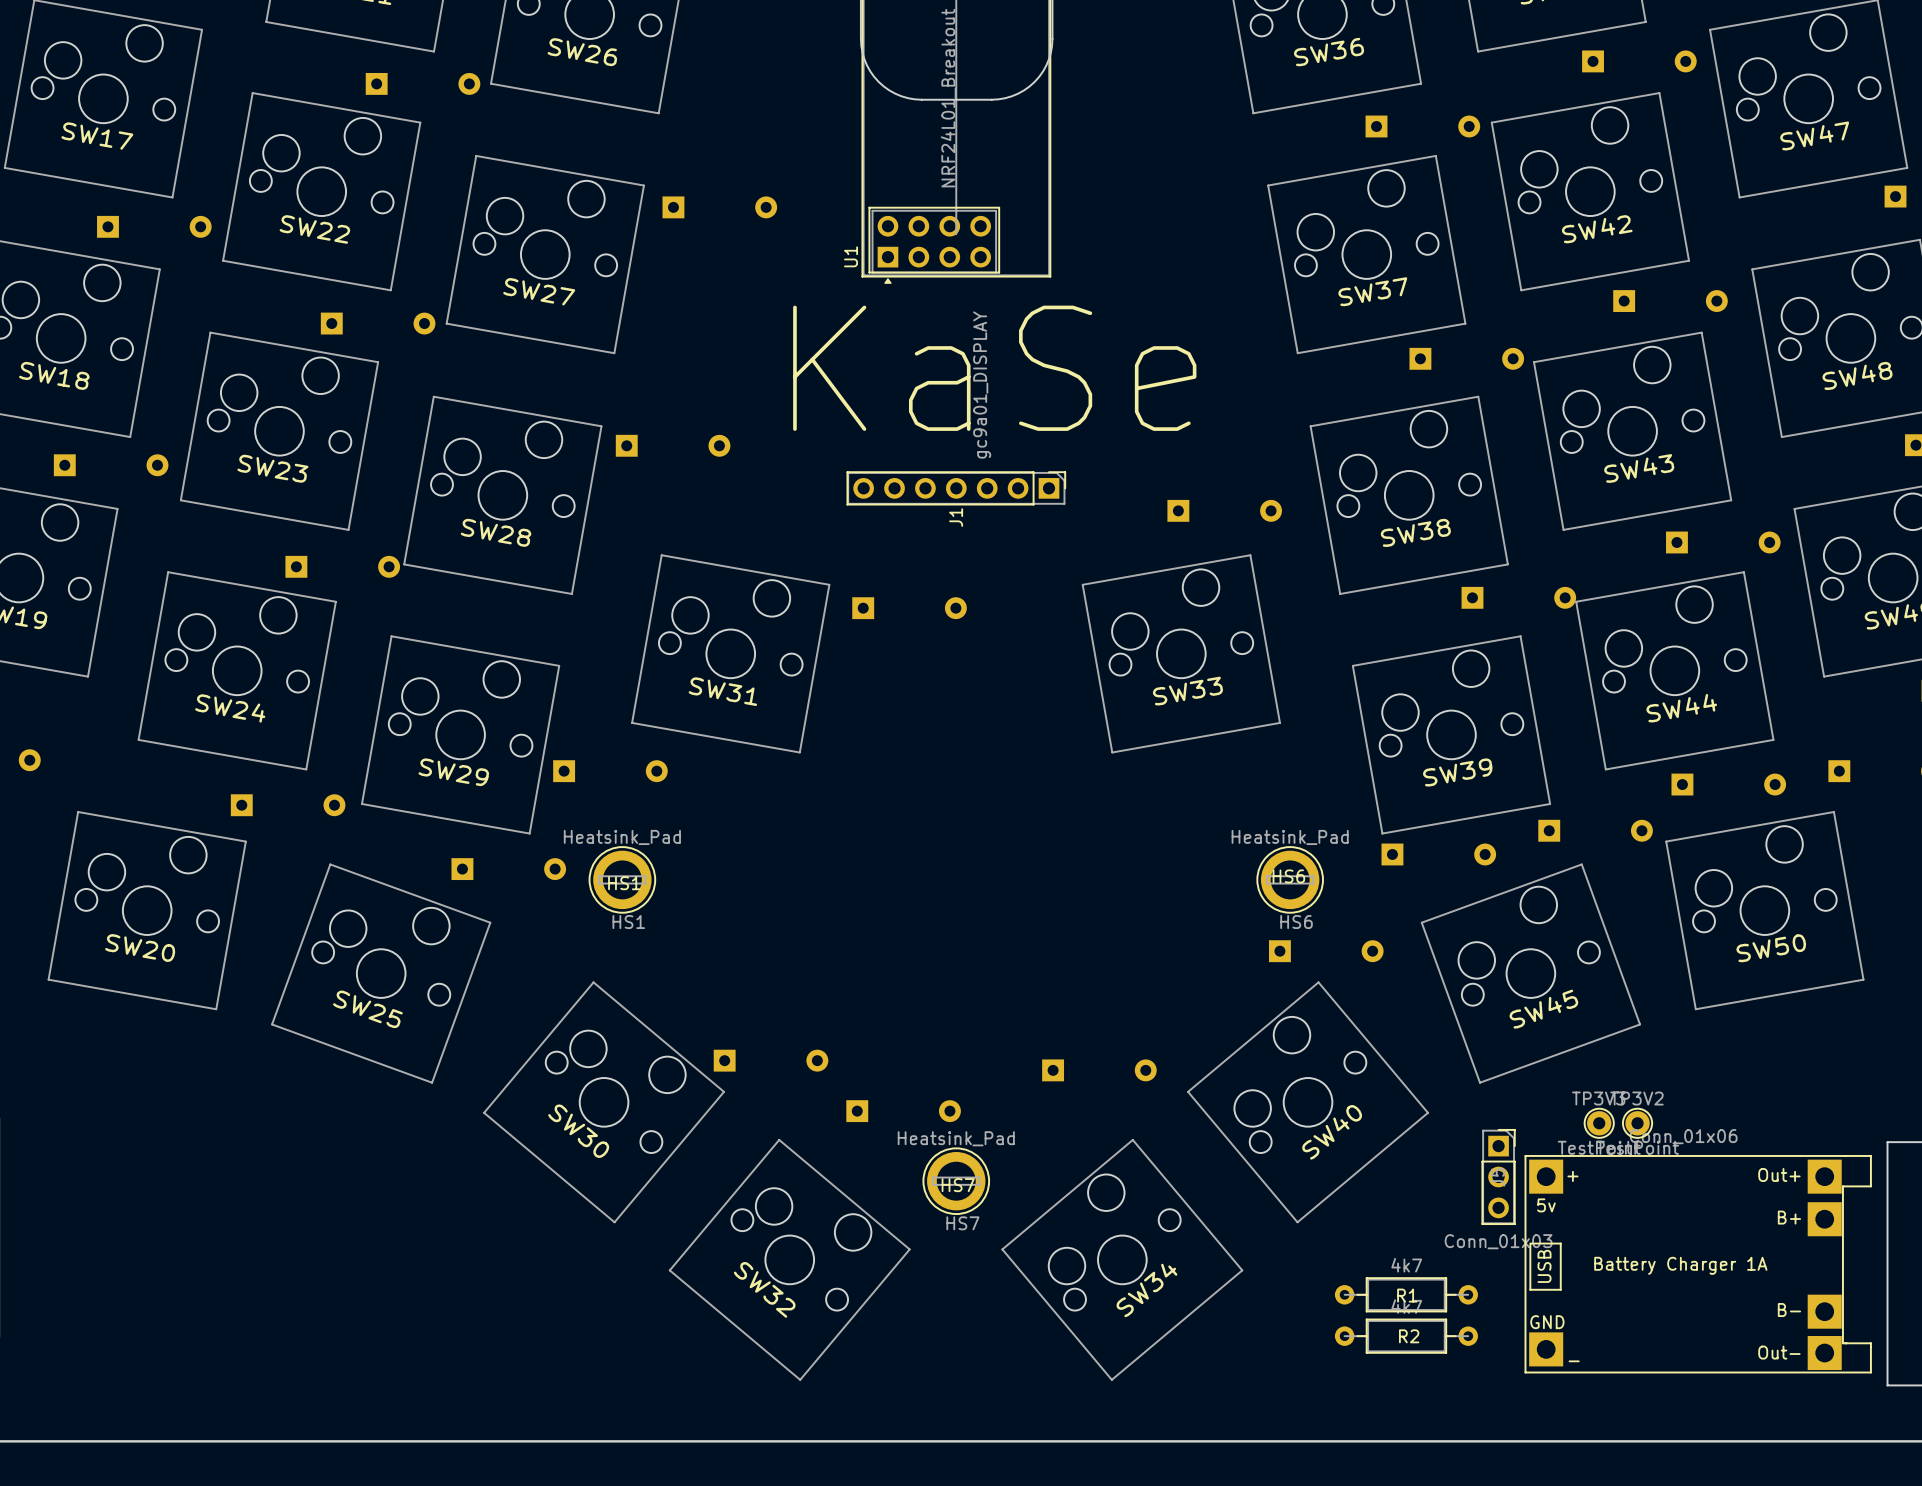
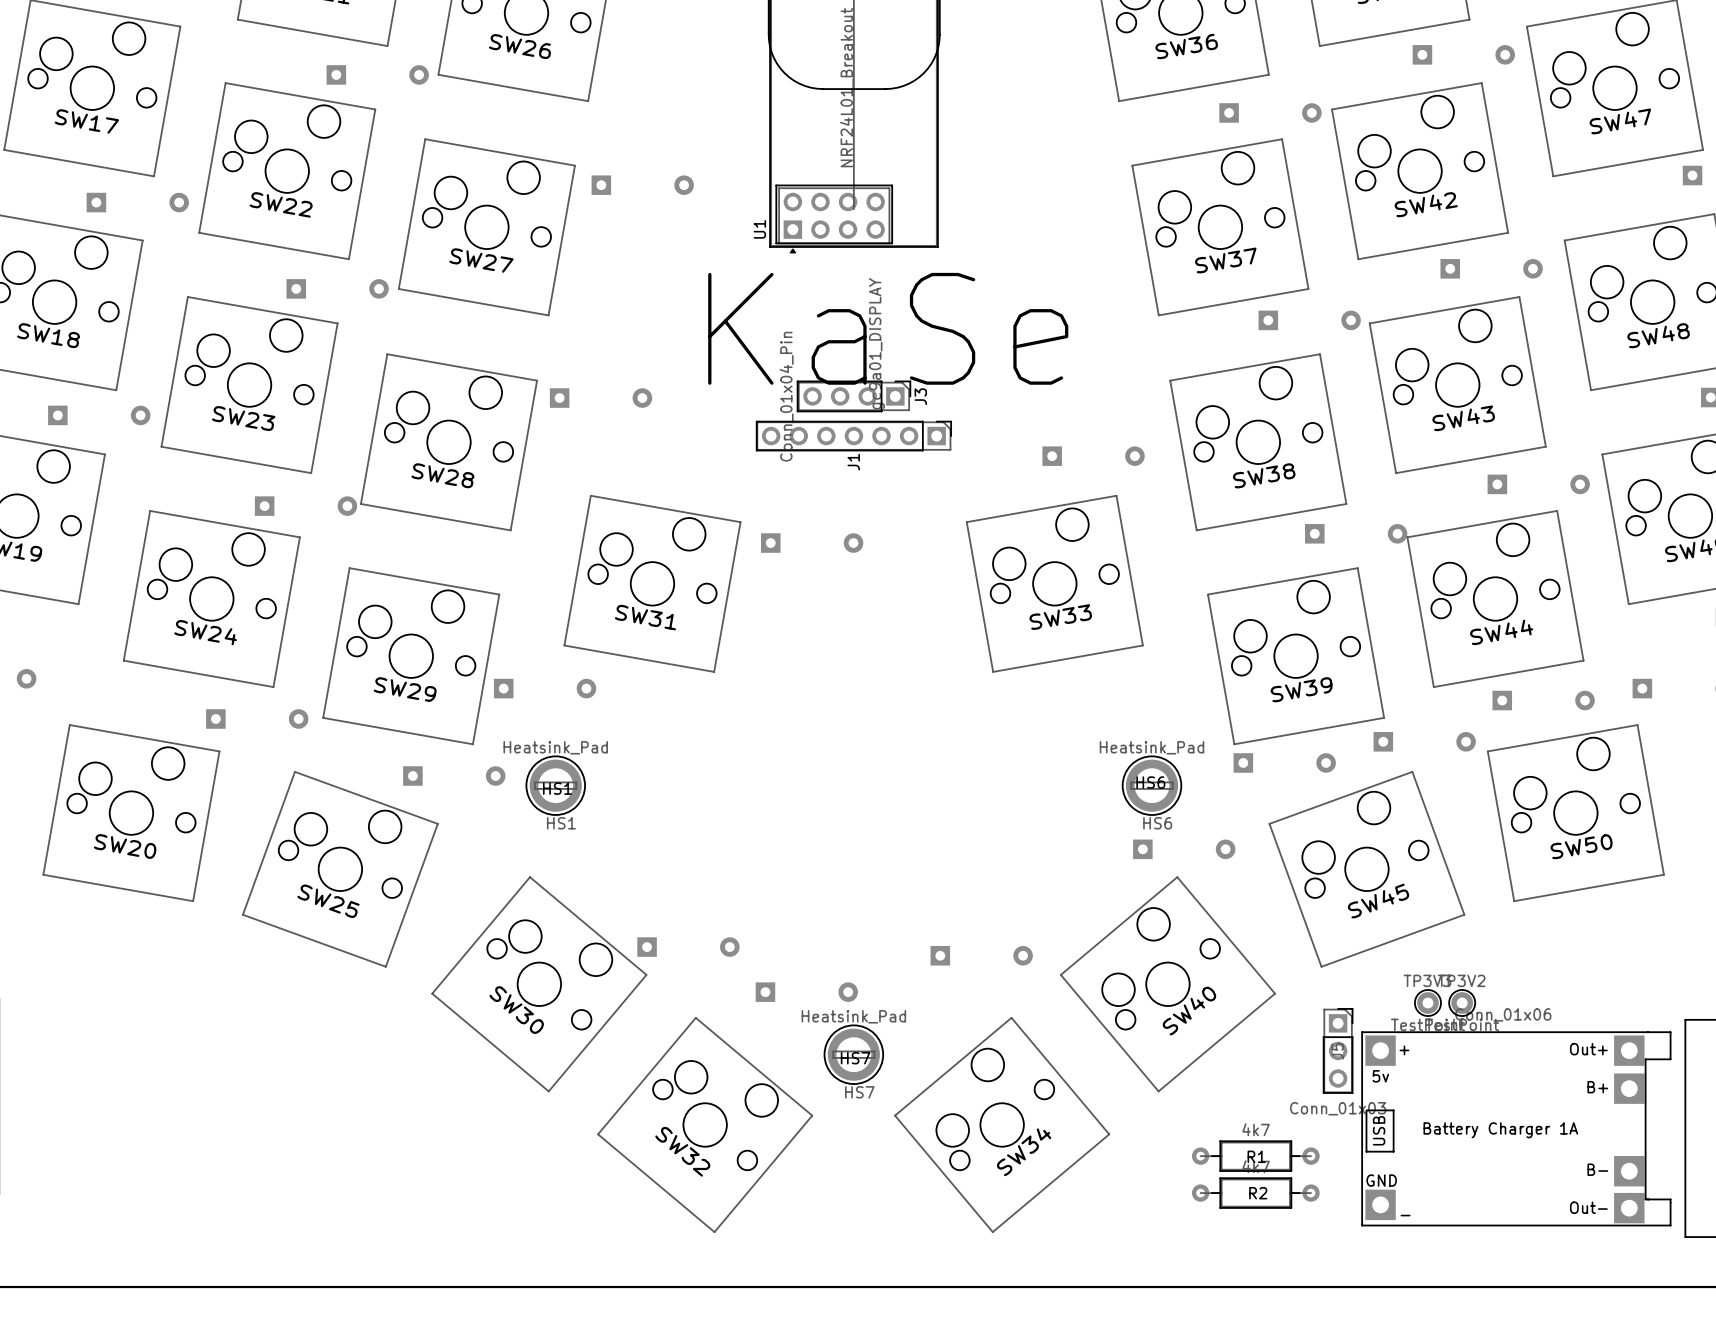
J3: none -> Conn_01x04_Pin (853, 396)

